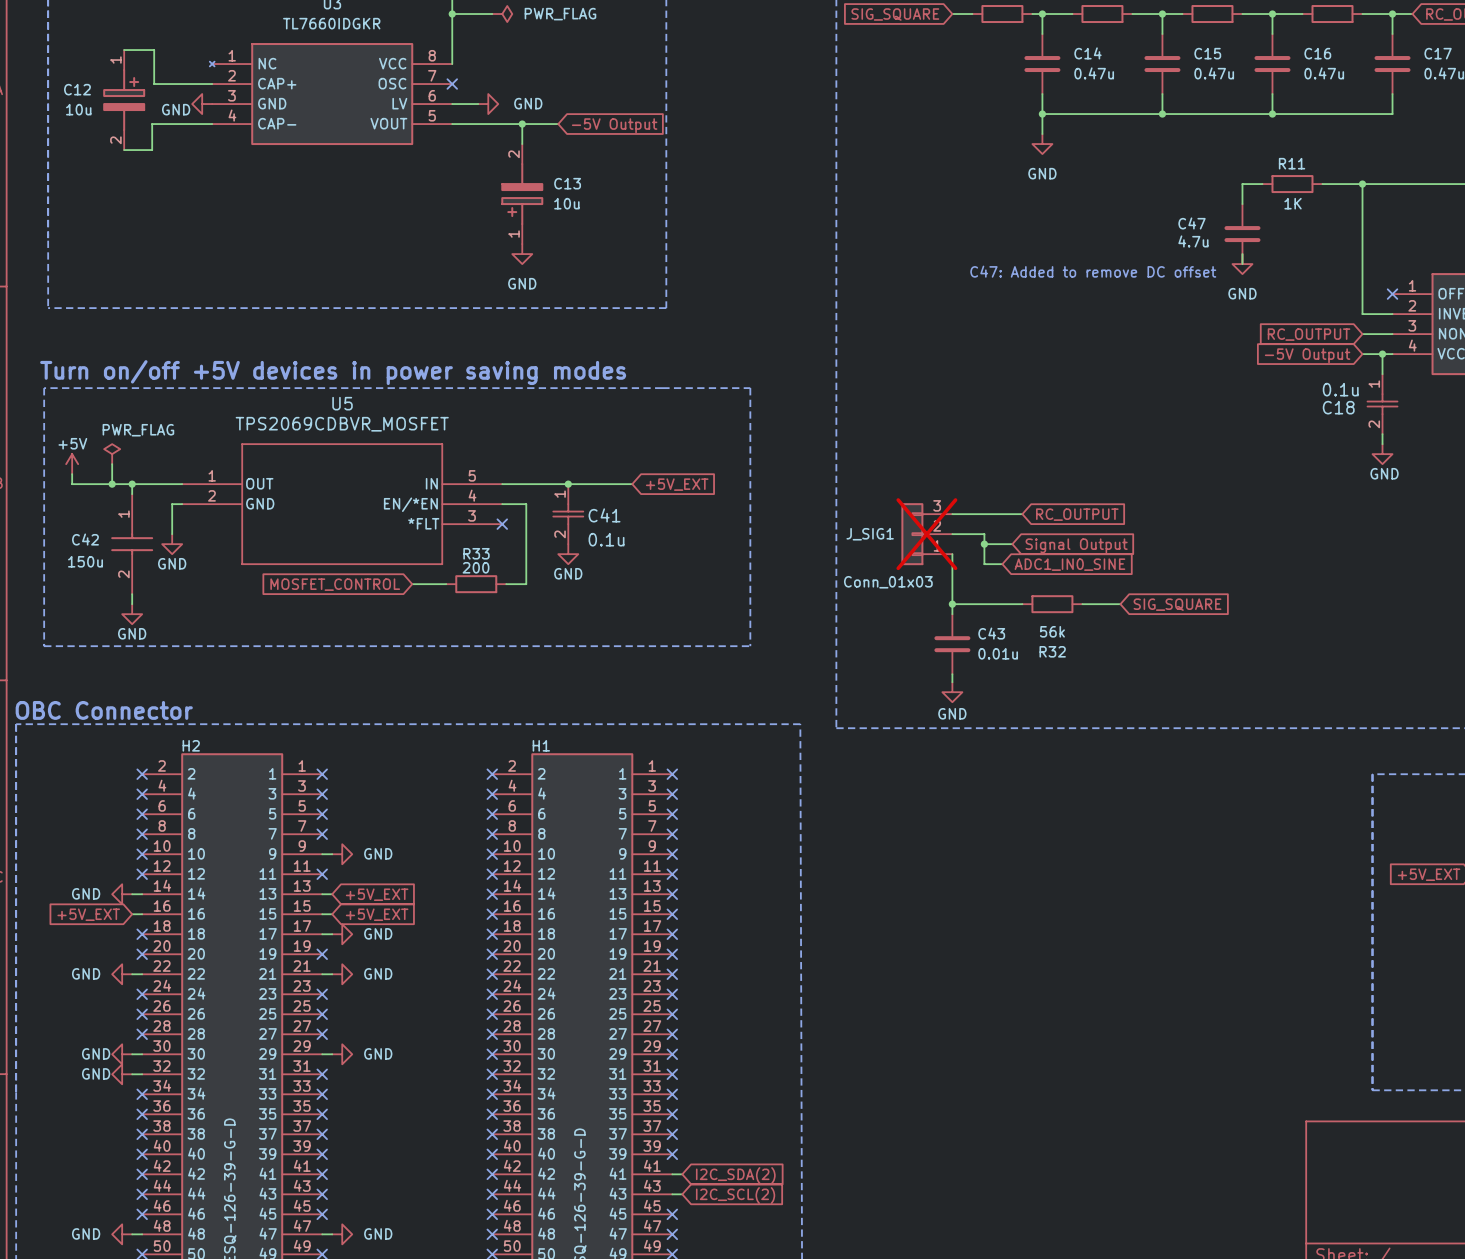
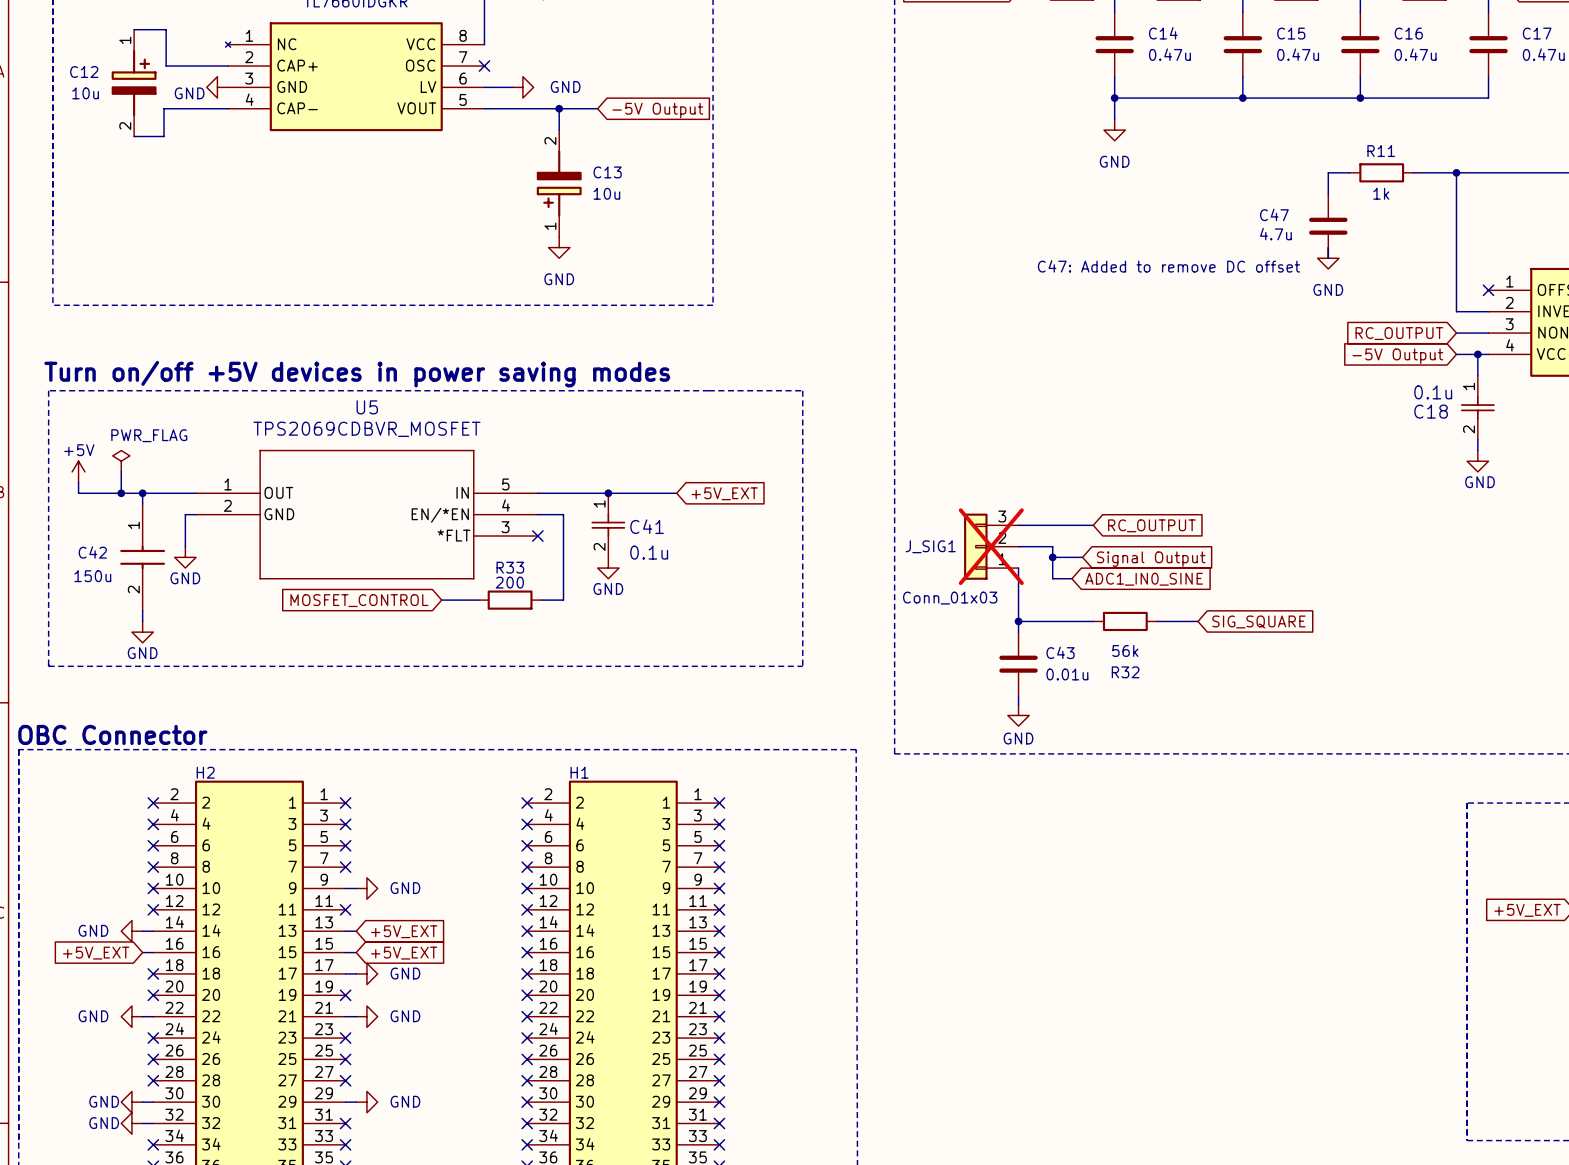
R11 value: 1K (1293, 203) -> 1k (1381, 193)

